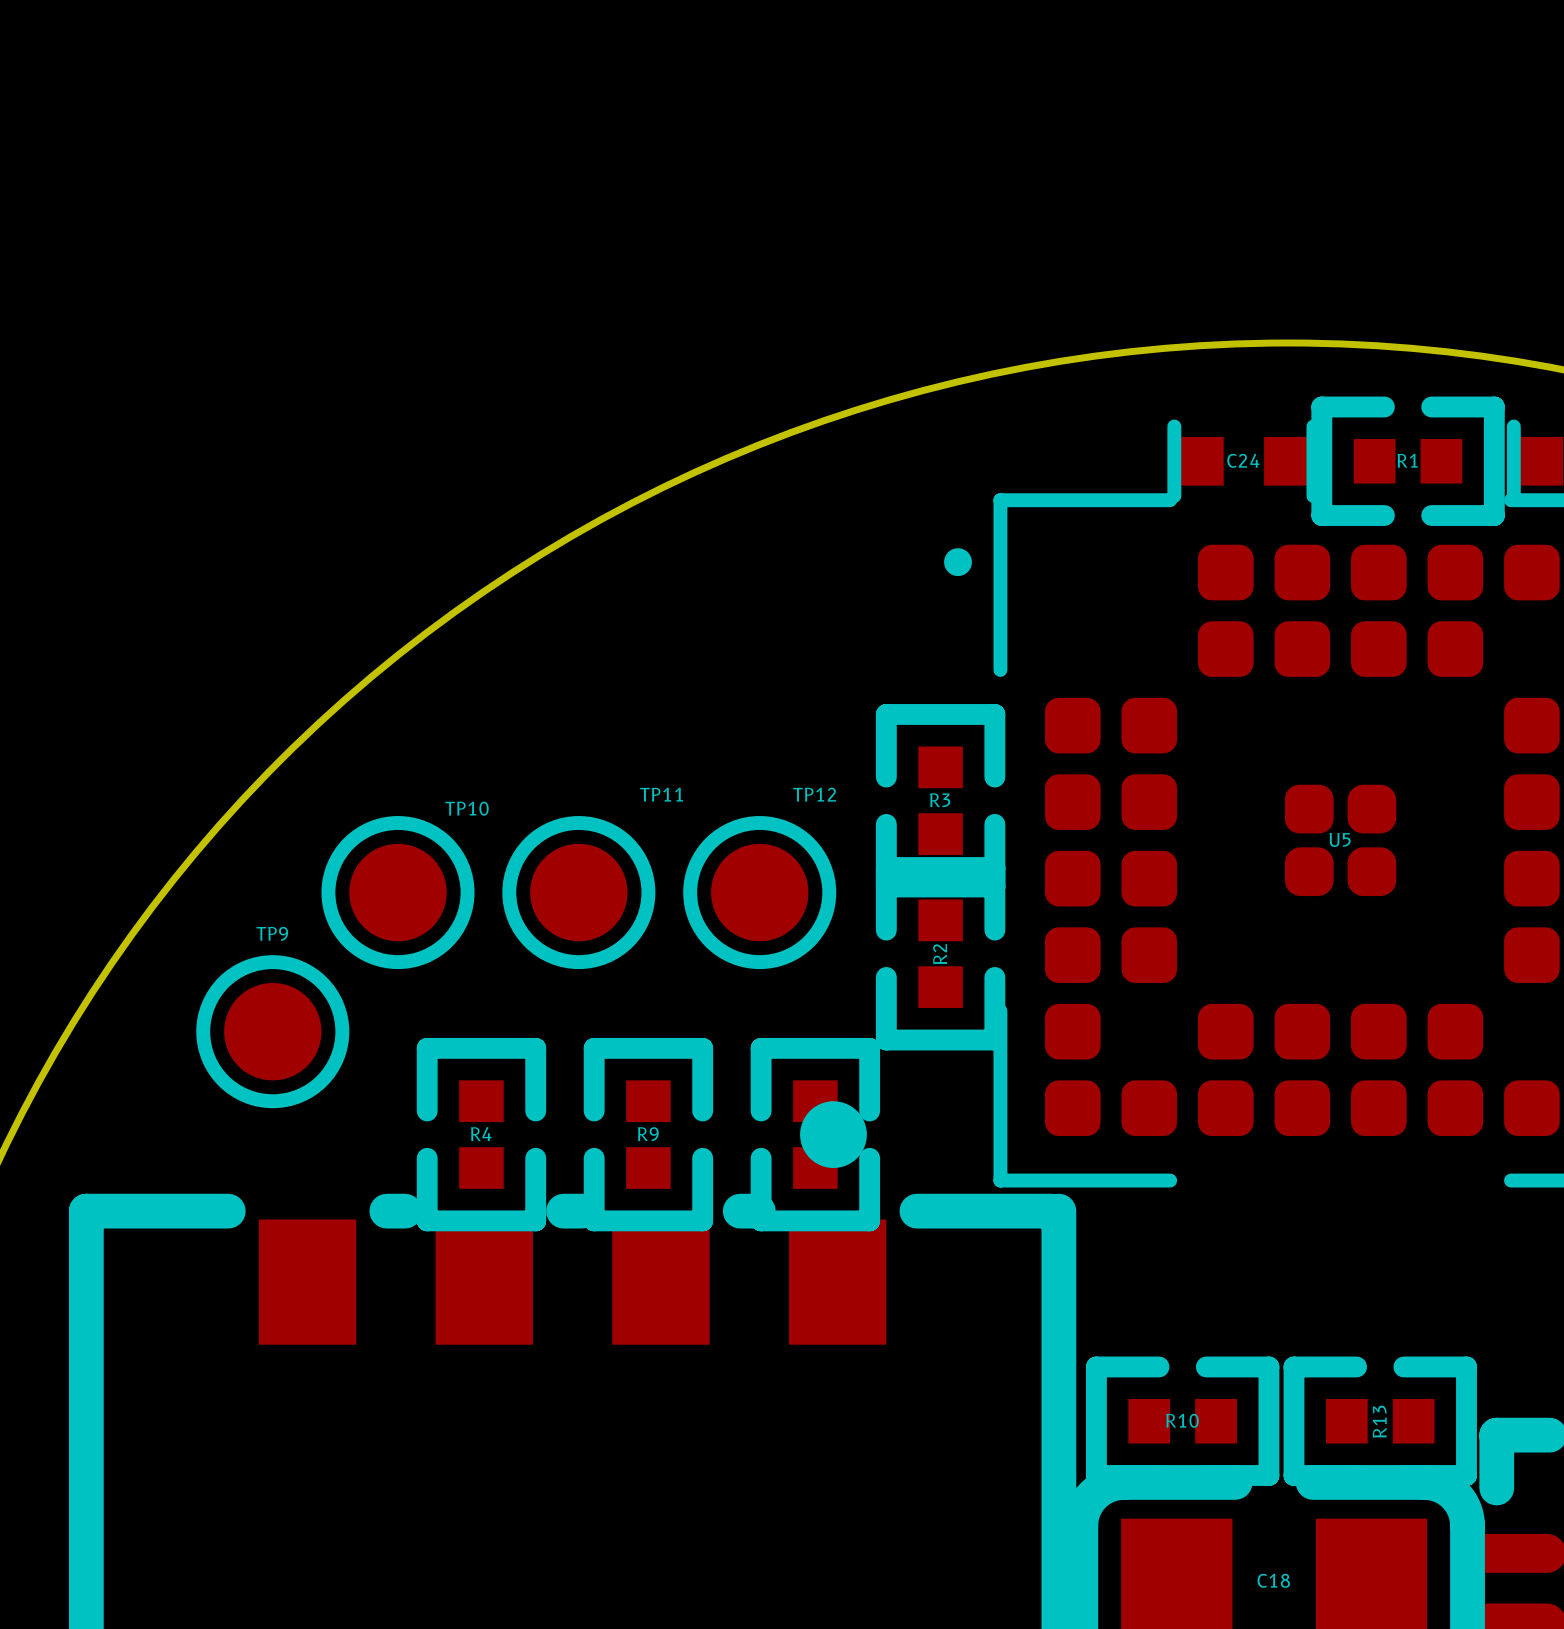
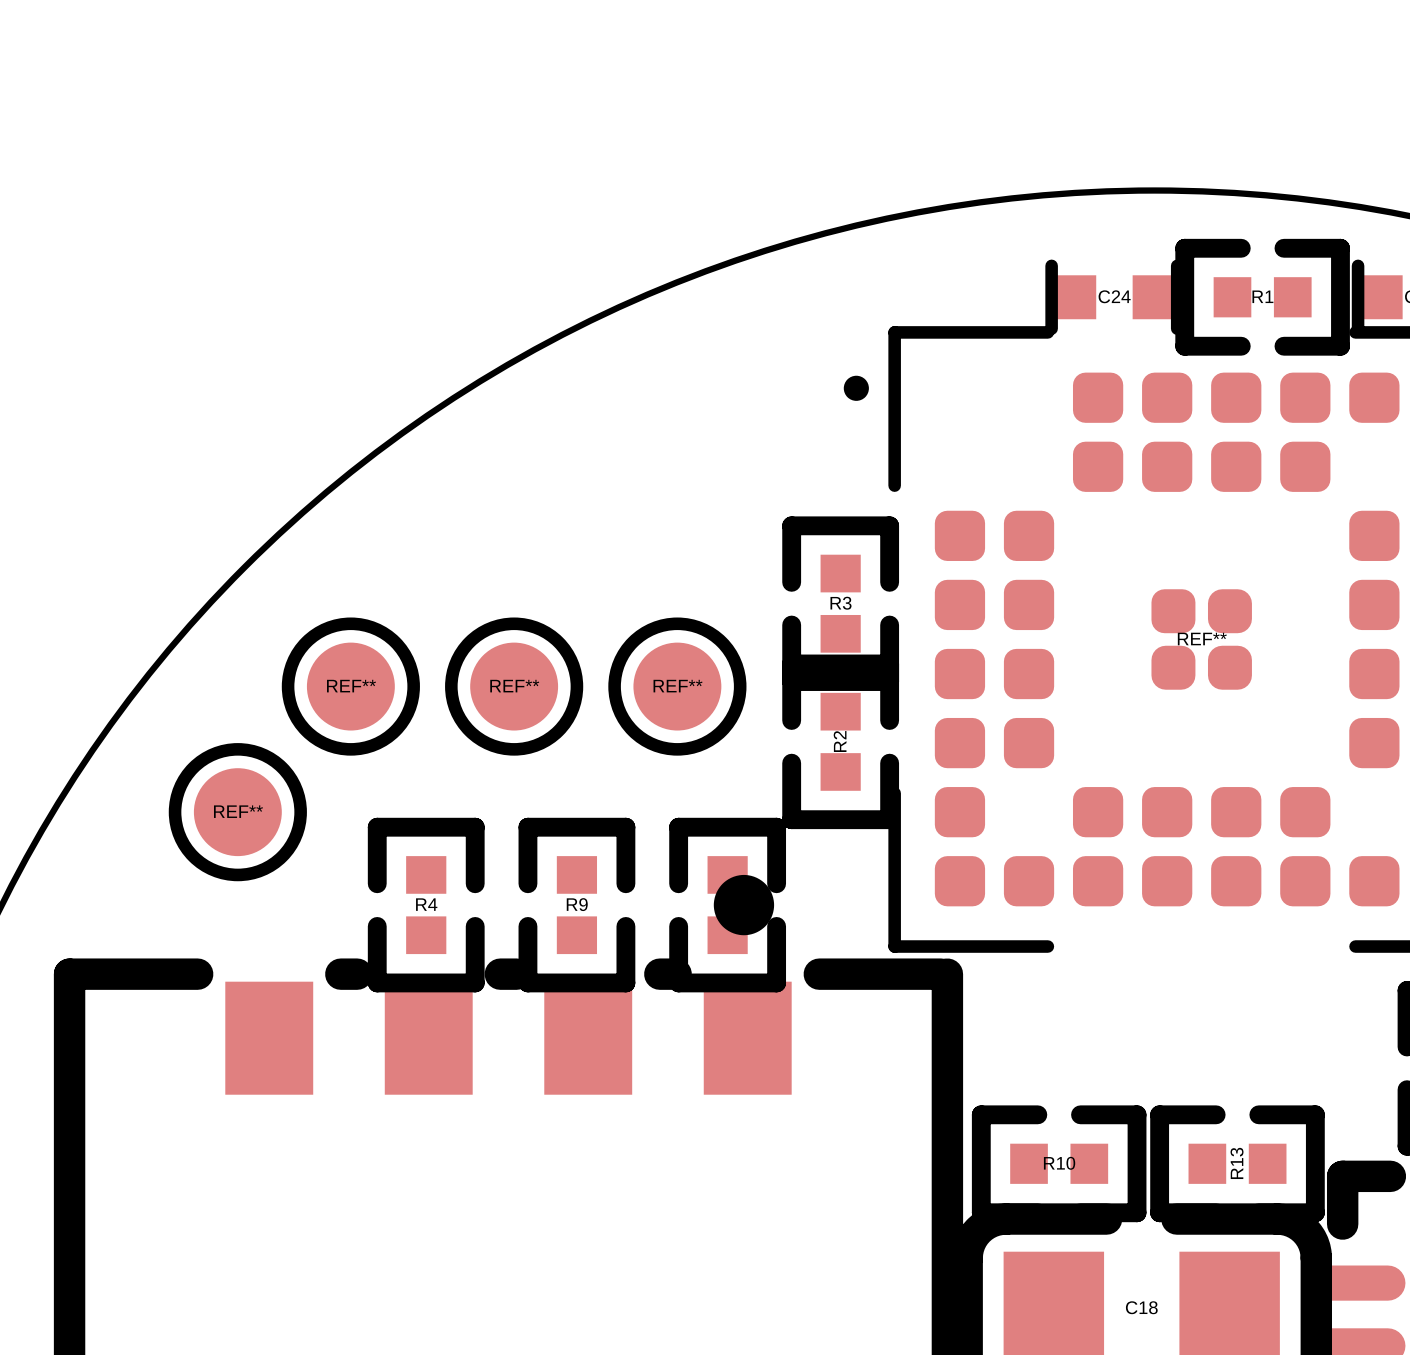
TP11 name: TP11 (661, 794) -> REF** (514, 686)
TP12 name: TP12 (814, 794) -> REF** (678, 686)
TP10 name: TP10 (467, 808) -> REF** (351, 686)
U5 name: U5 (1340, 839) -> REF** (1202, 639)
TP9 name: TP9 (272, 933) -> REF** (238, 811)

